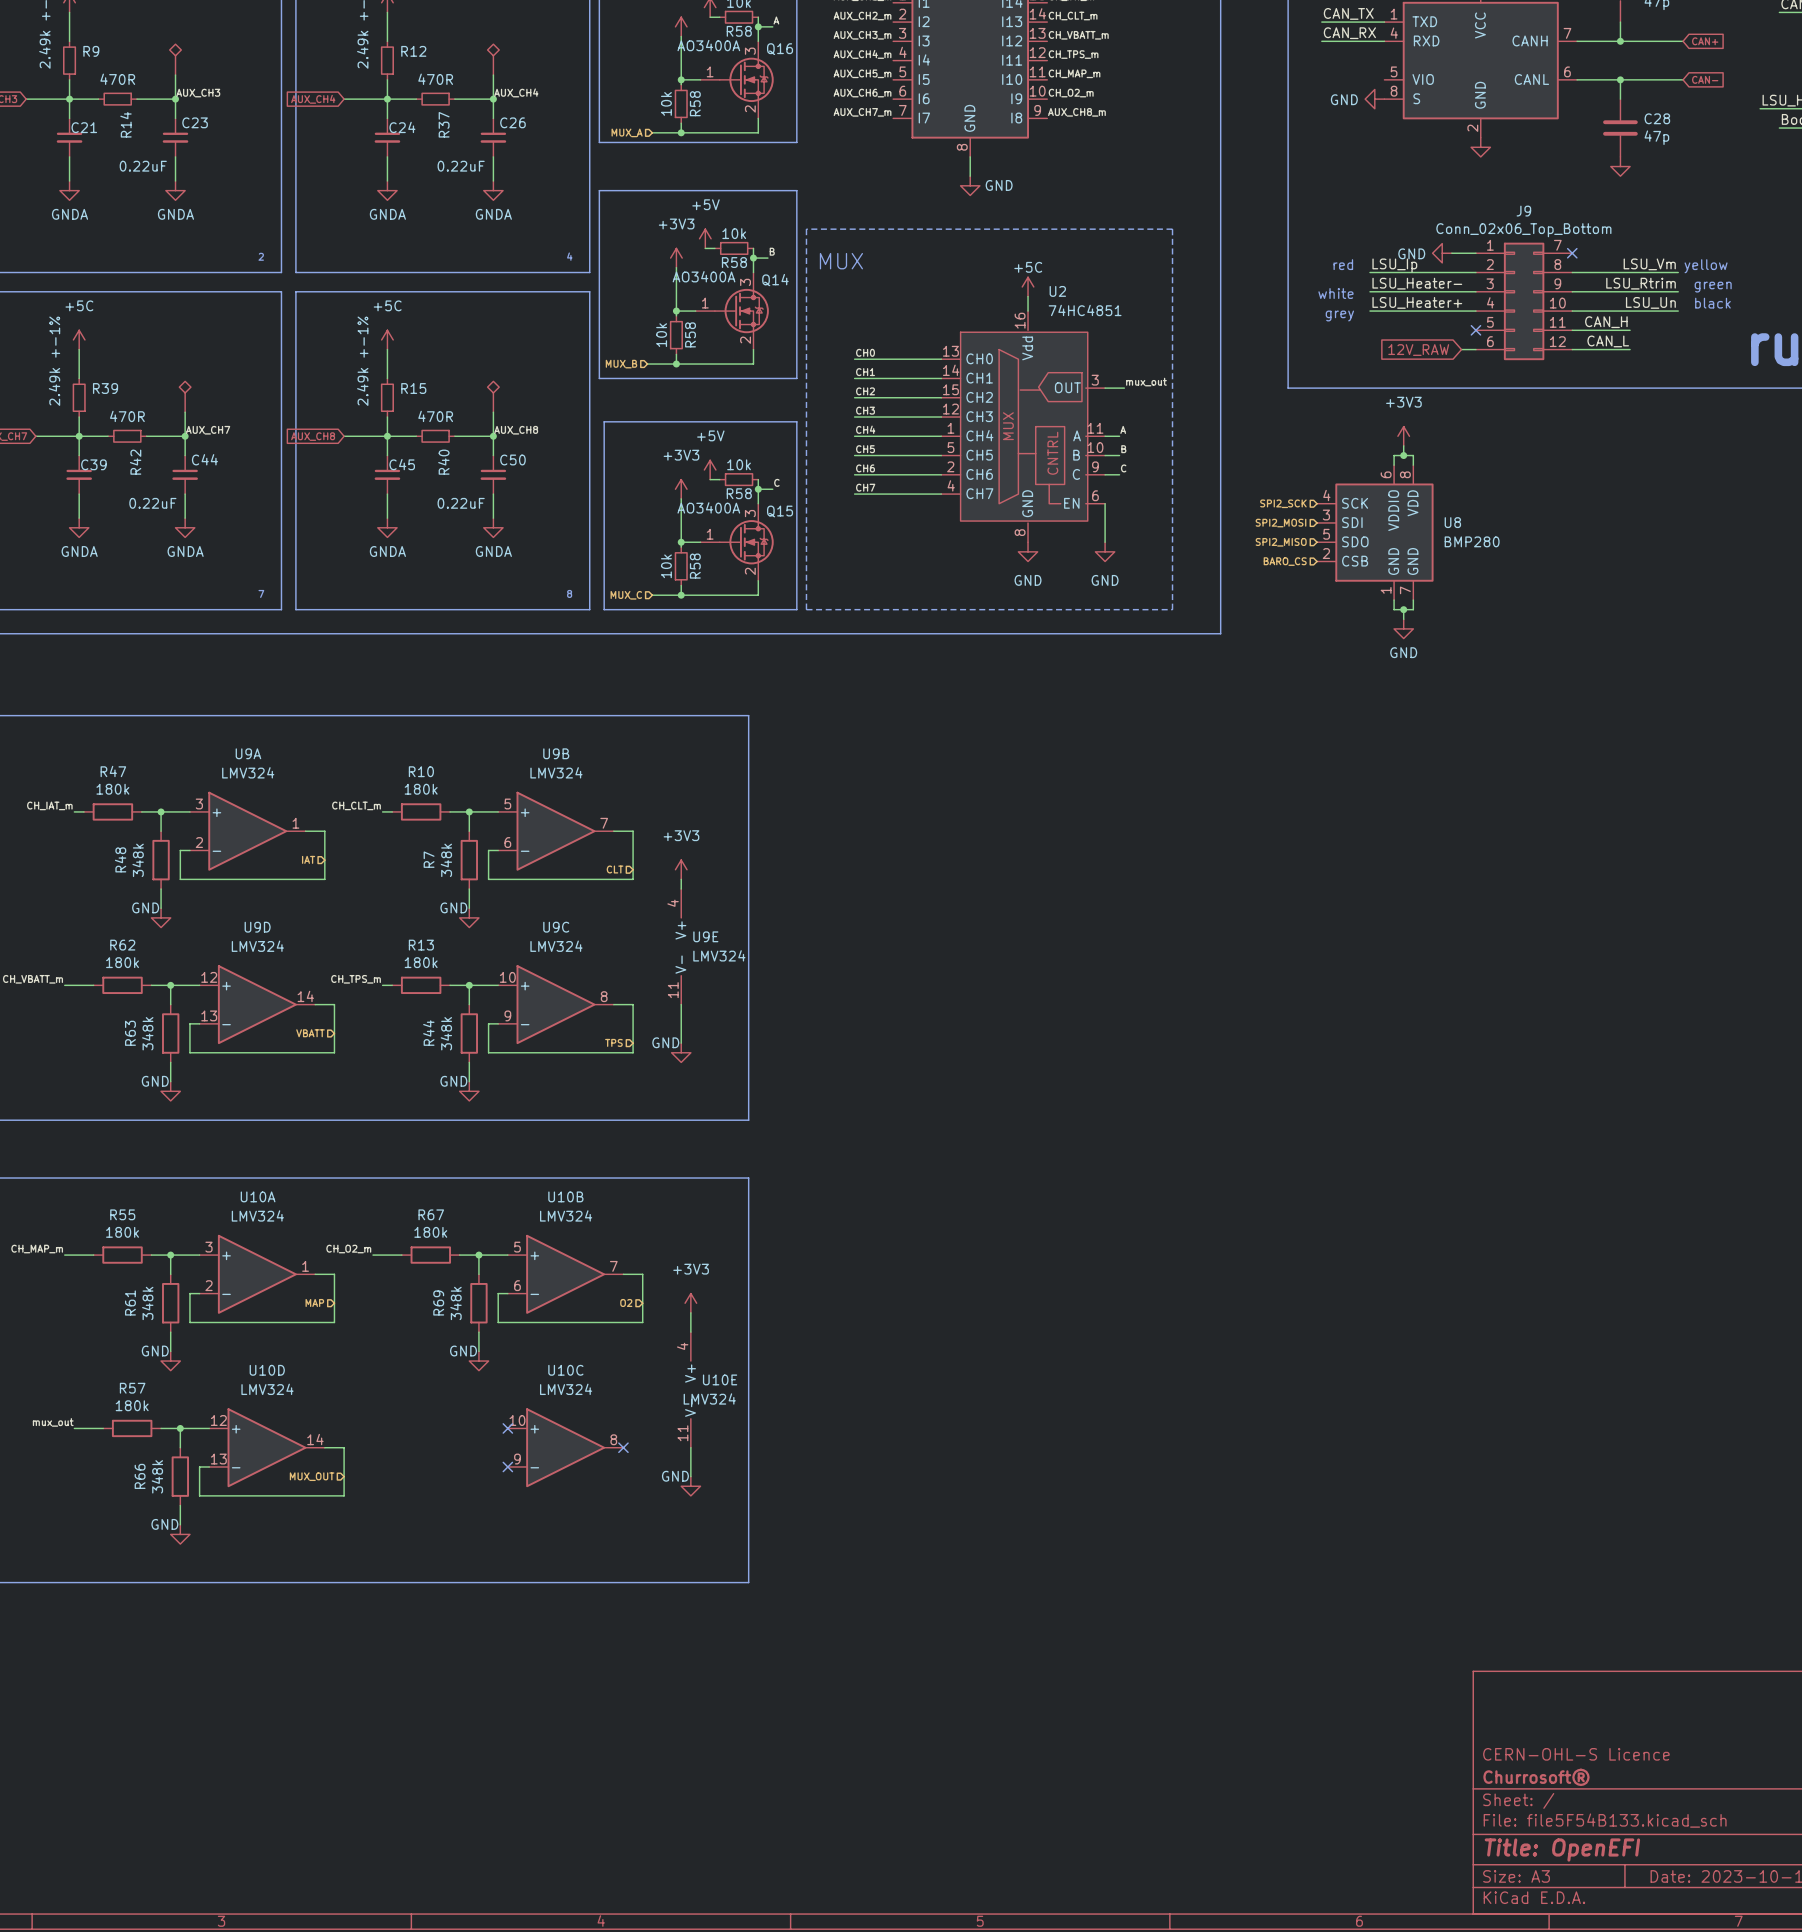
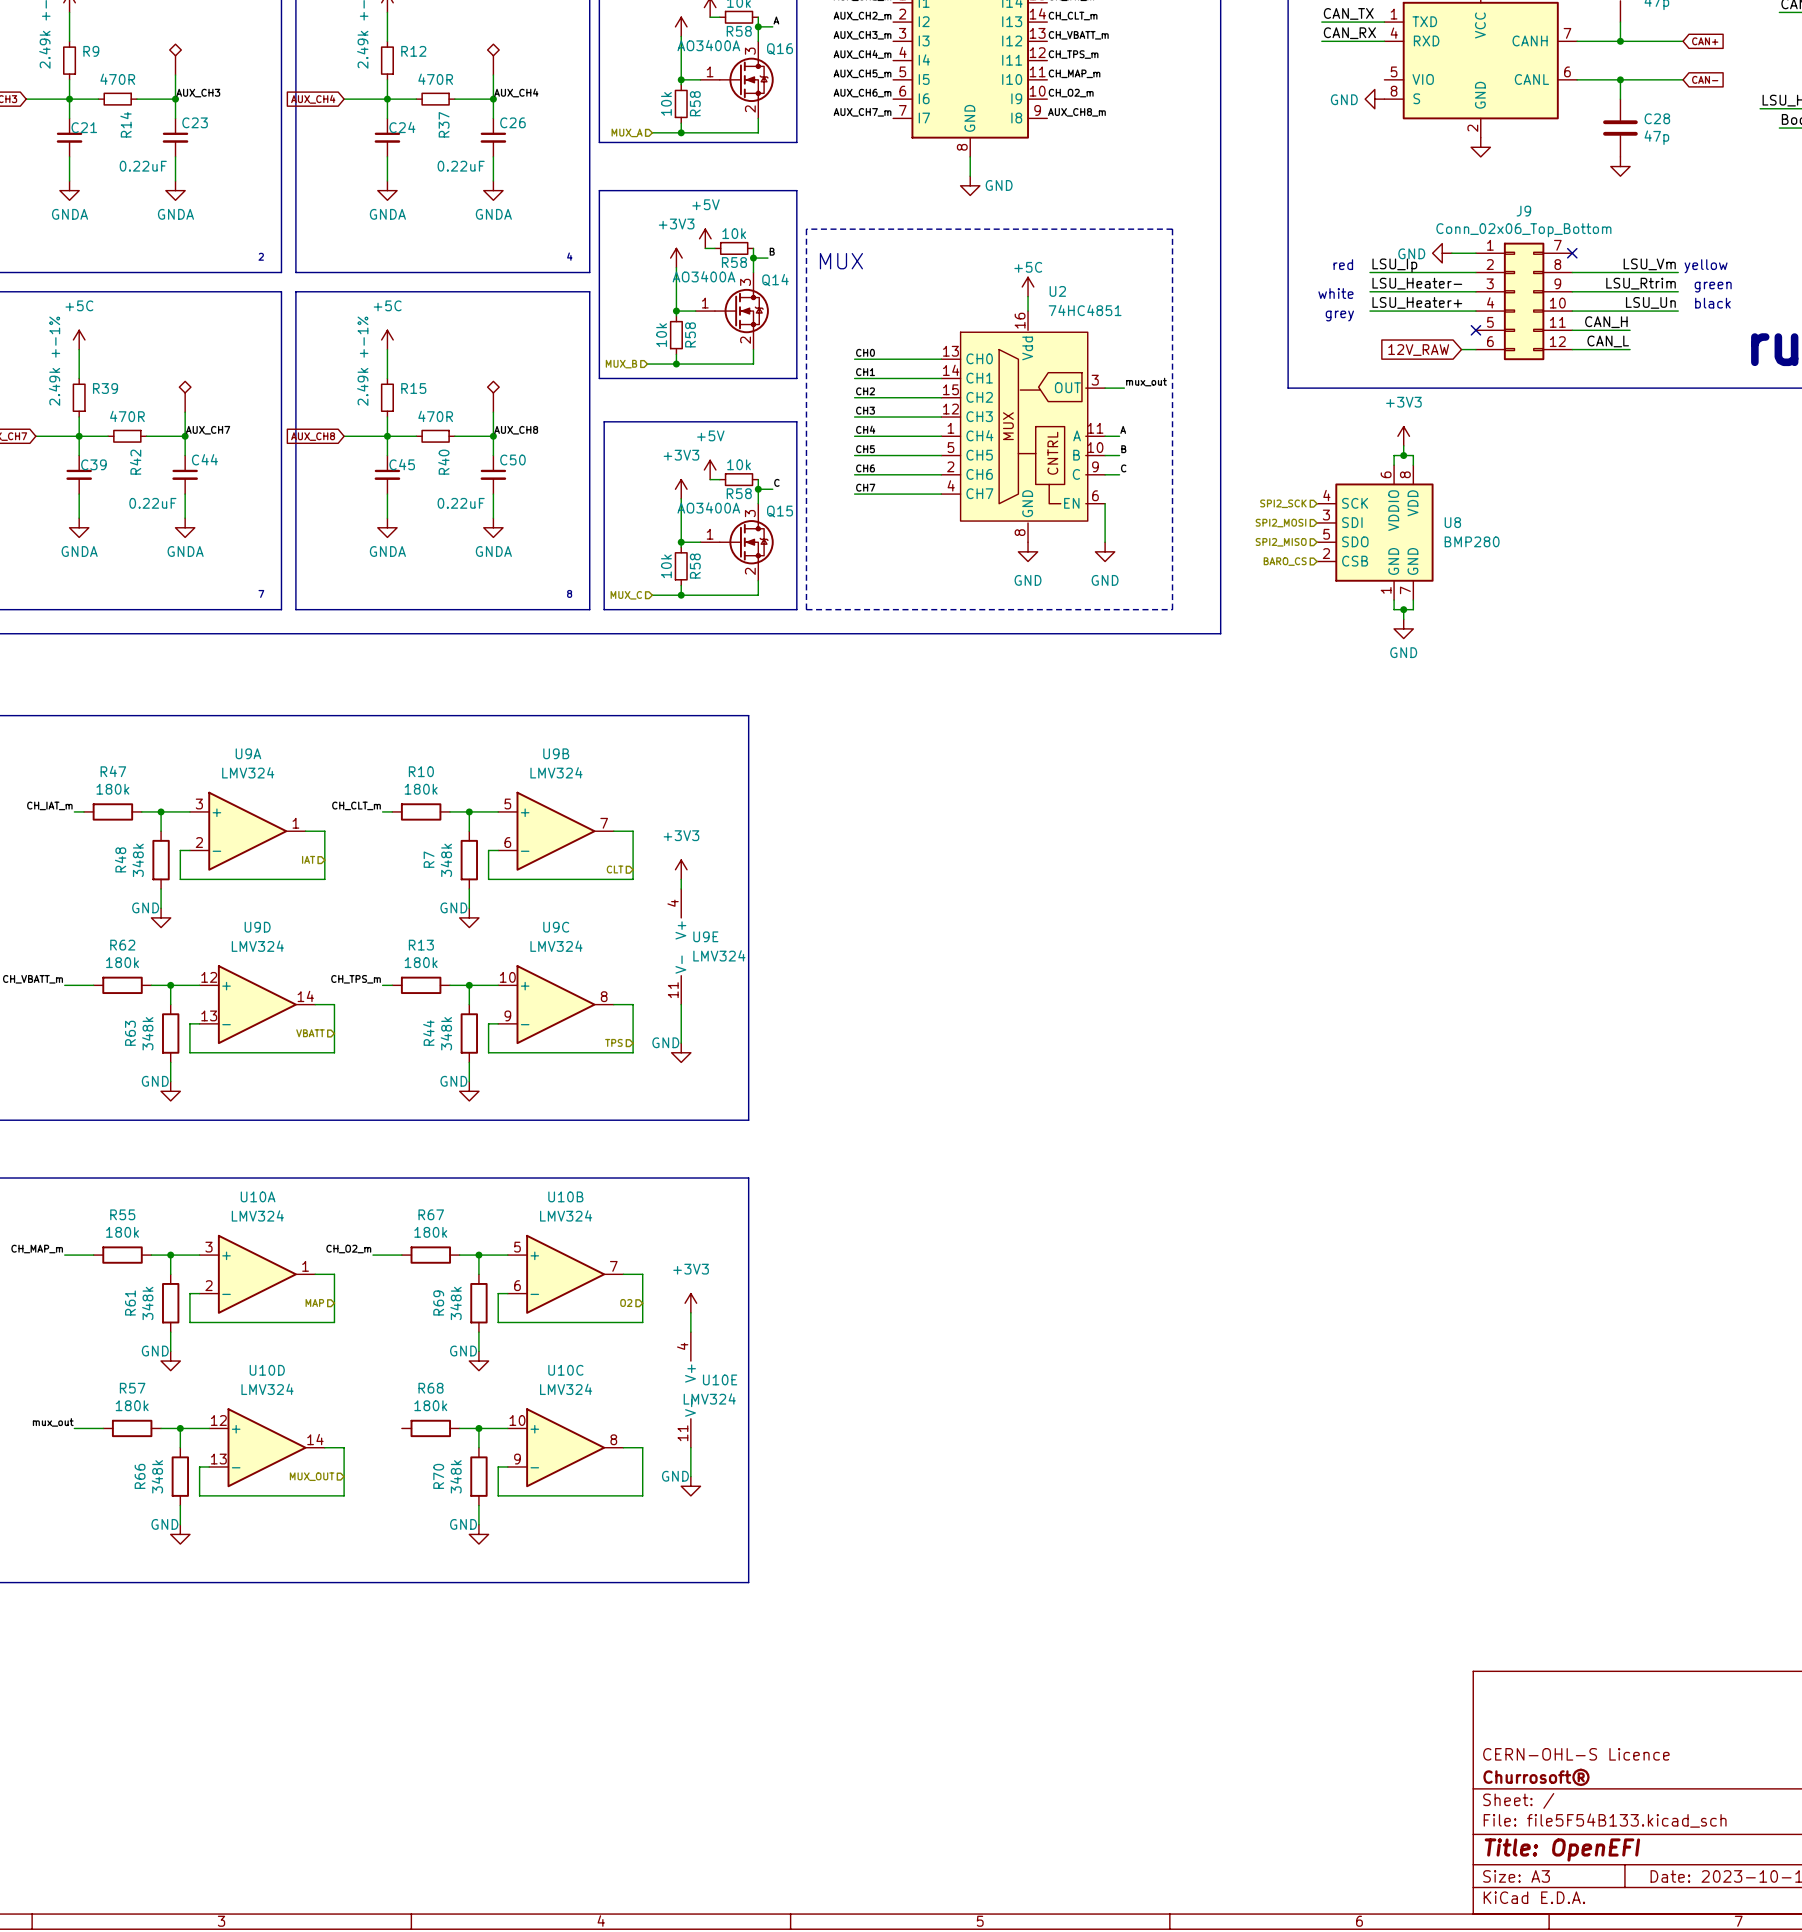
R68: none -> 180k (430, 1428)
wire: none -> (459, 1428) (507, 1428)
wire: none -> (478, 1428) (478, 1447)
junction: none -> (478, 1428)
no-connect mark: (507, 1428) -> none
wire: none -> (623, 1447) (642, 1447) (642, 1495) (498, 1495) (498, 1466) (507, 1466)
no-connect mark: (623, 1447) -> none
no-connect mark: (507, 1466) -> none
R70: none -> 348k (478, 1476)
wire: none -> (478, 1505) (478, 1524)
power symbol: none -> GND (478, 1534)

